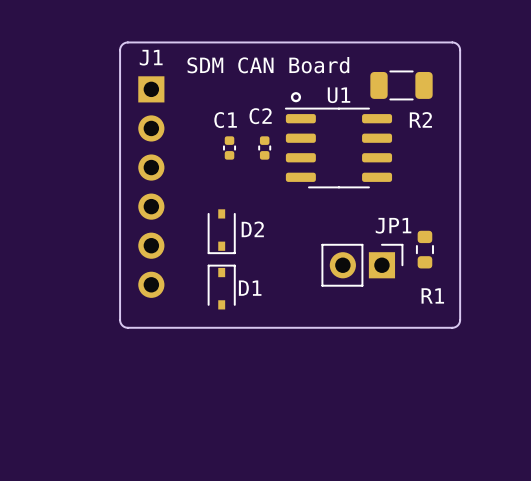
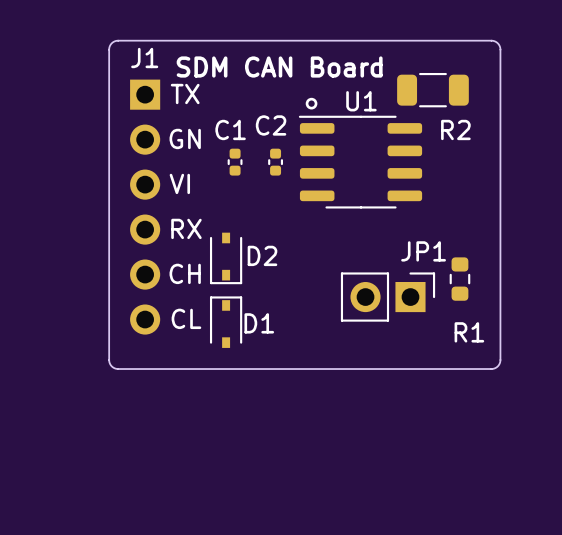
text: none -> TX (185, 93)
text: none -> GN (185, 138)
text: none -> VI (179, 183)
text: none -> RX (186, 228)
text: none -> CH (185, 273)
text: none -> CL (186, 318)

